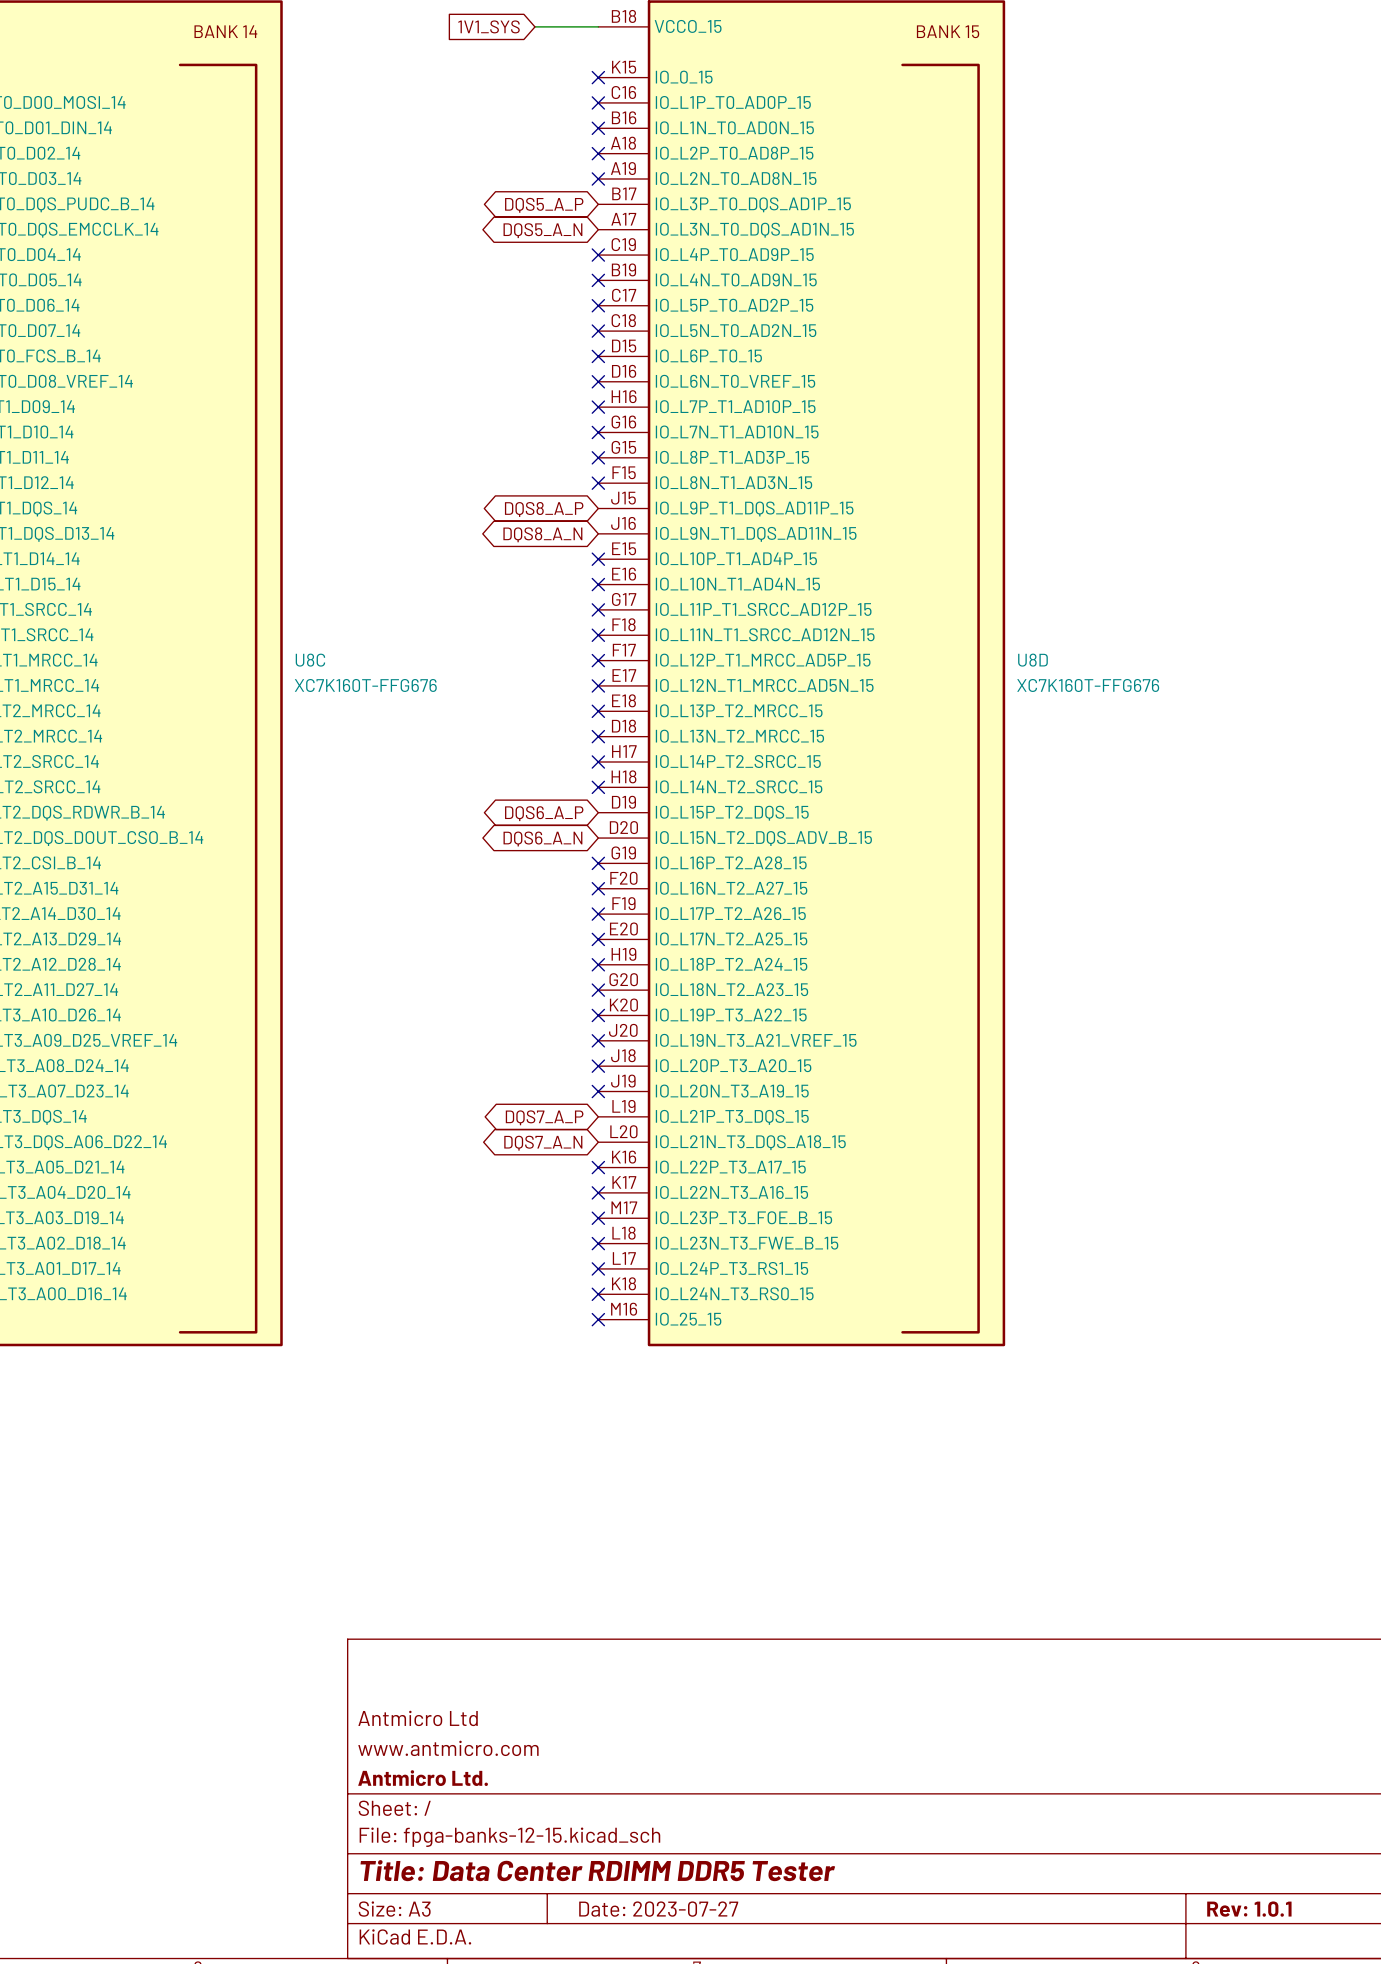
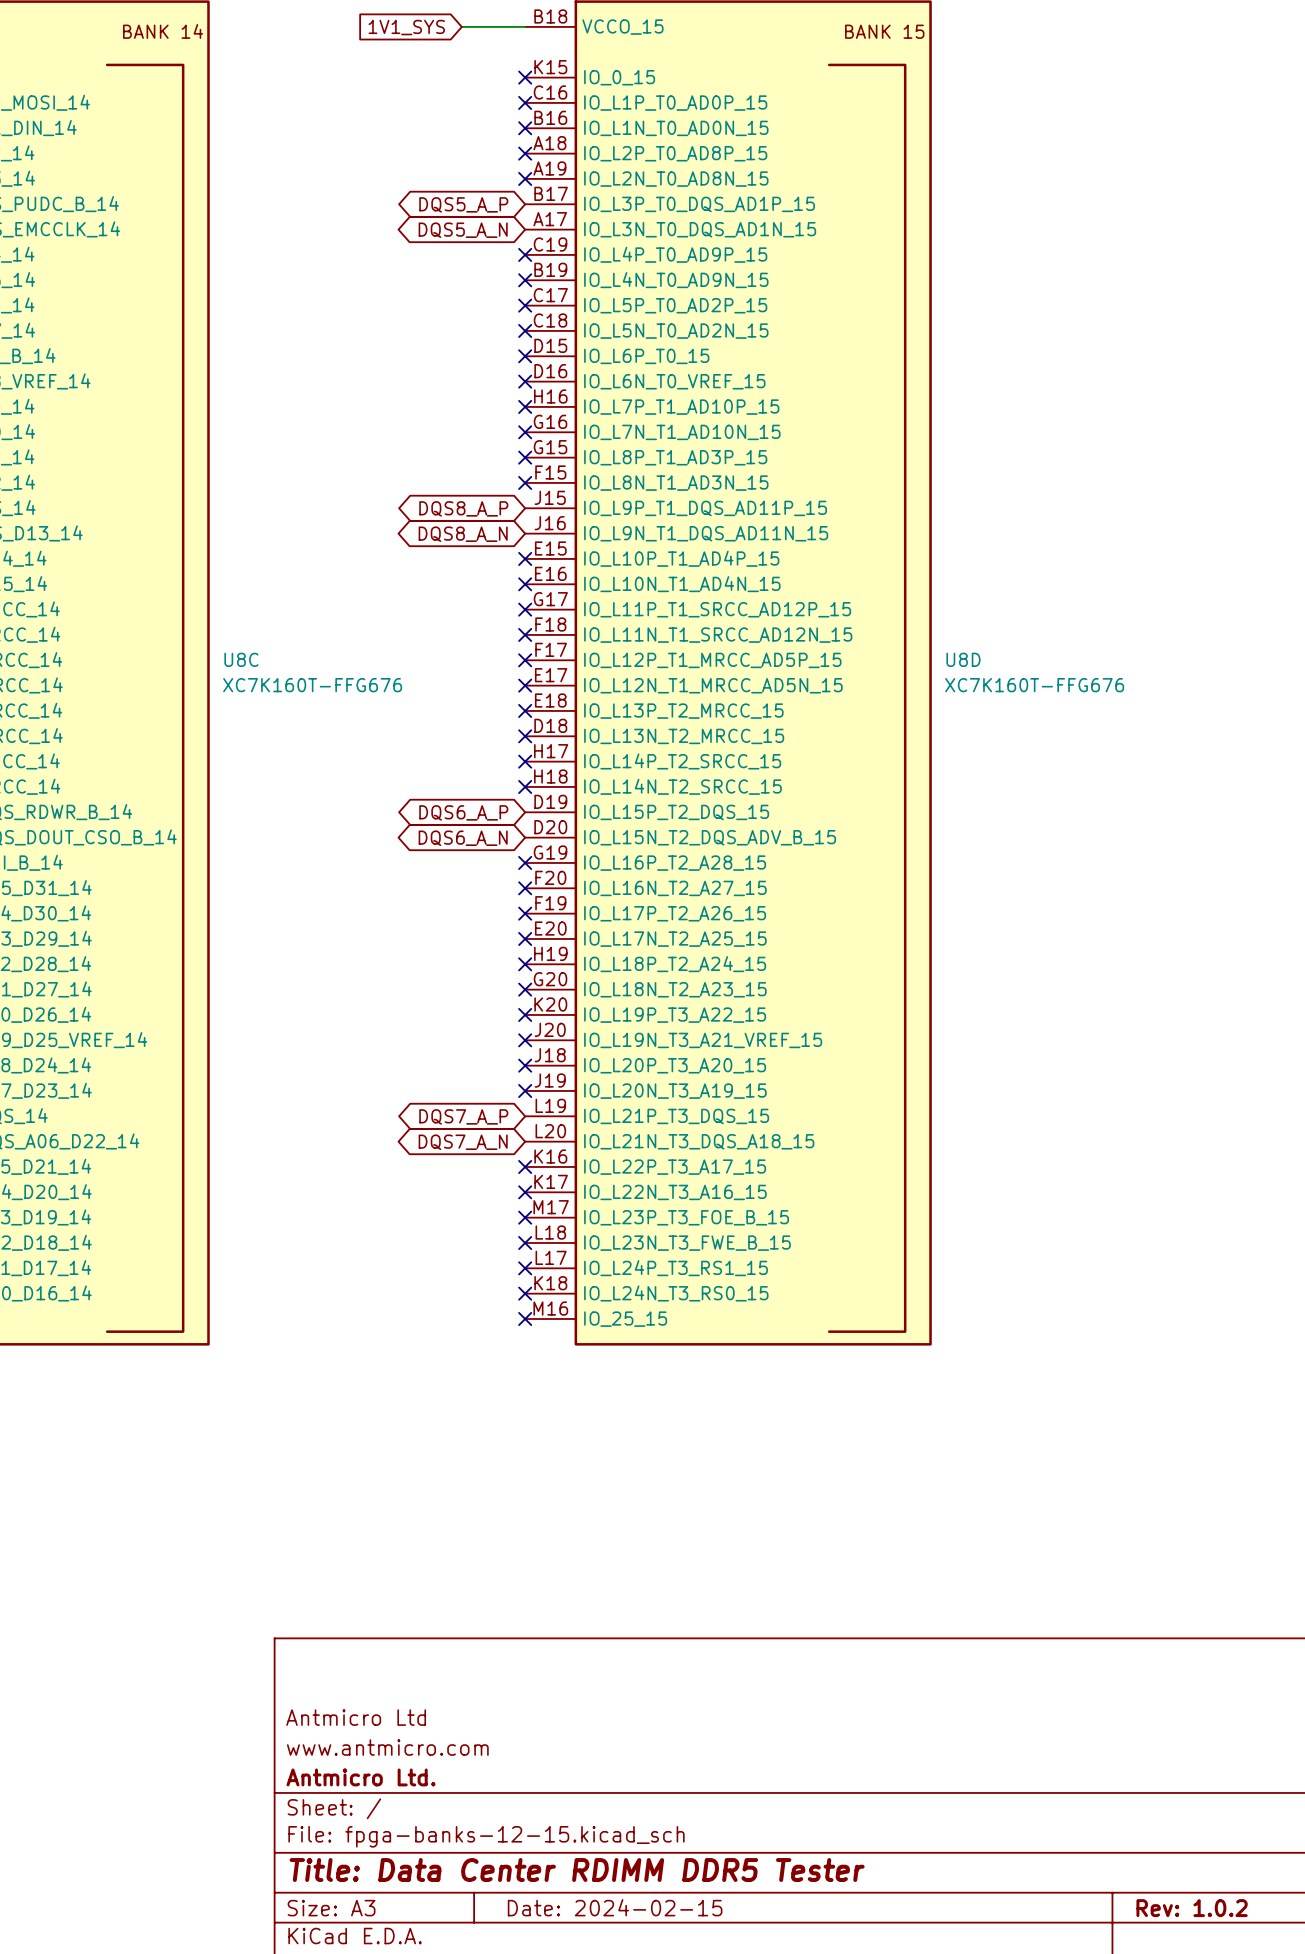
title block: Date: 2023-07-27 (658, 1909) -> Date: 2024-02-15 (615, 1907)
title block: Rev: 1.0.1 (1249, 1909) -> Rev: 1.0.2 (1192, 1908)

